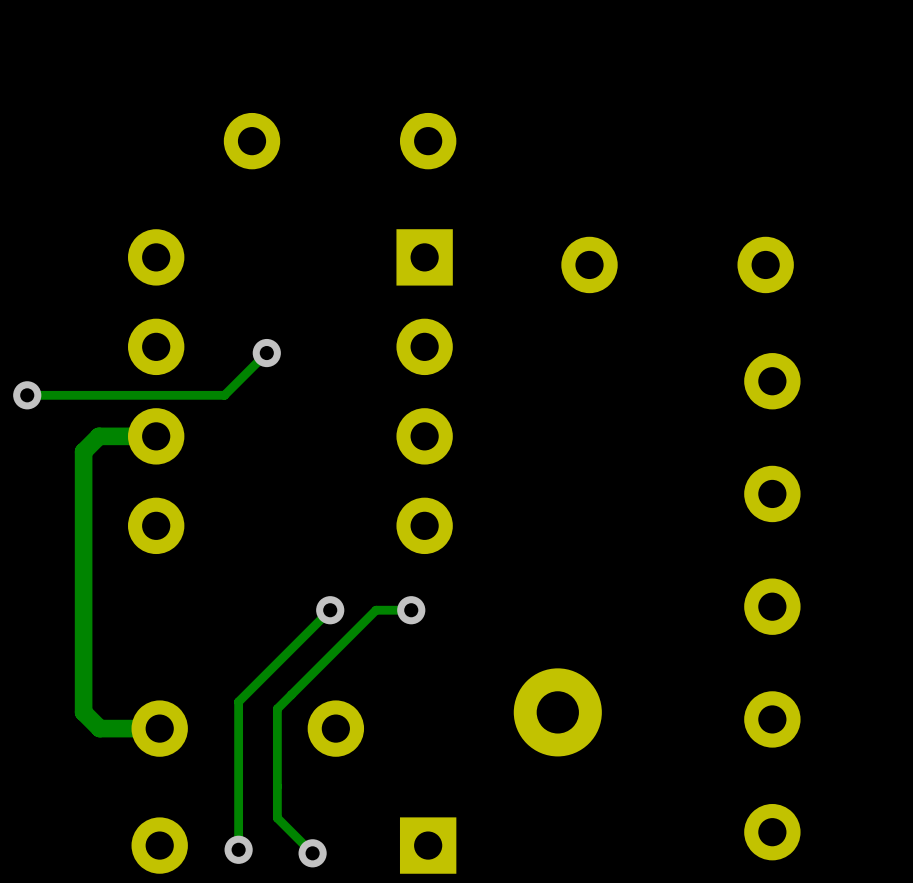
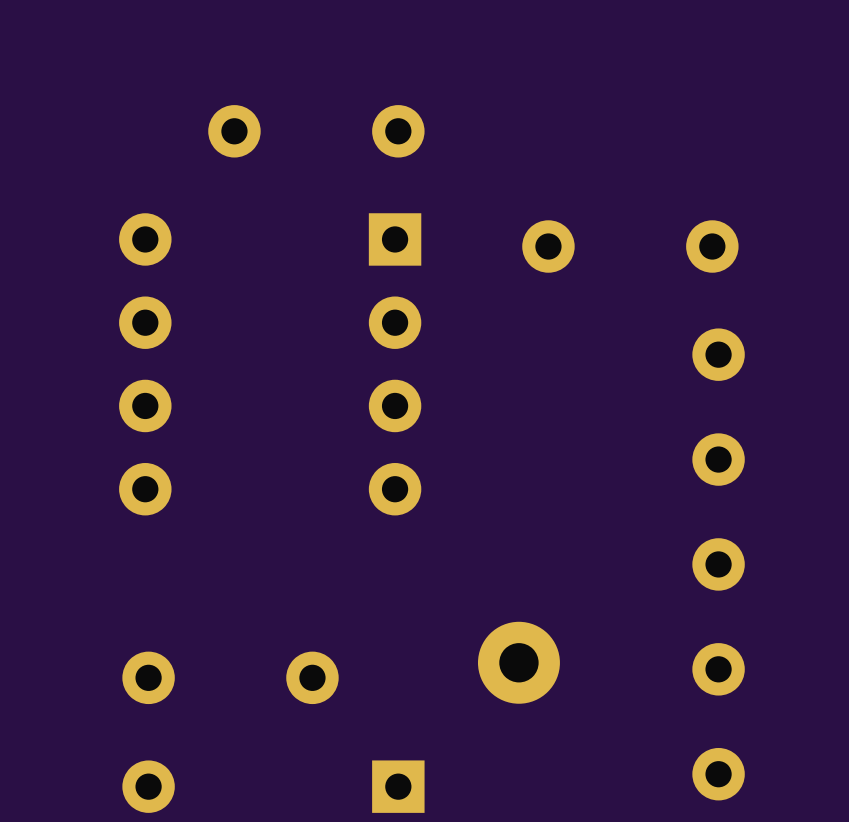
track: (266, 353) (224, 395) (27, 395) -> none
via: (266, 353) -> none
via: (27, 395) -> none
track: (156, 436) (98, 436) (83, 451) (83, 712) (99, 728) (159, 728) -> none
track: (330, 610) (238, 701) (238, 849) -> none
via: (330, 610) -> none
track: (411, 610) (376, 610) (277, 708) (277, 818) (312, 853) -> none
via: (411, 610) -> none
via: (238, 849) -> none
via: (312, 853) -> none

